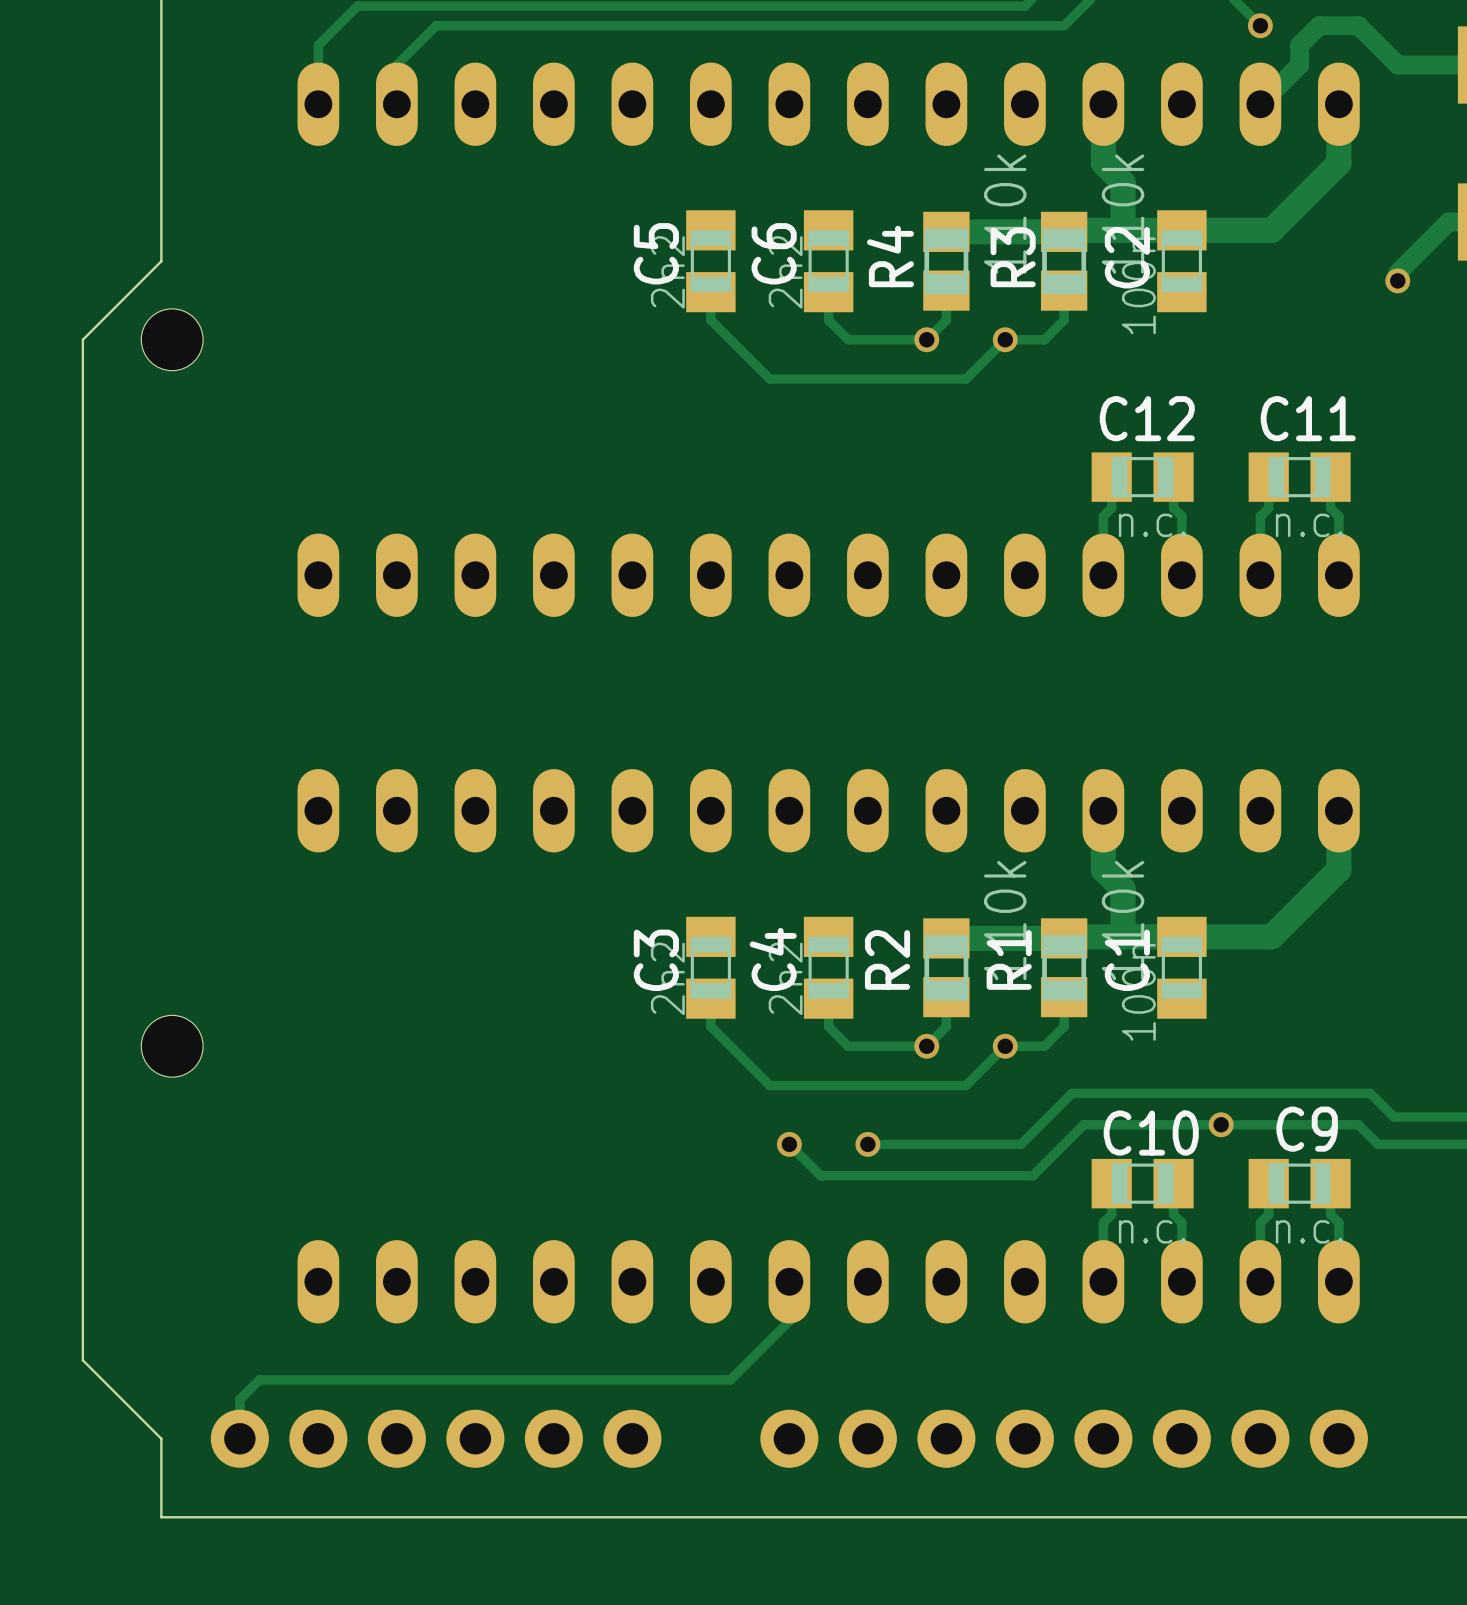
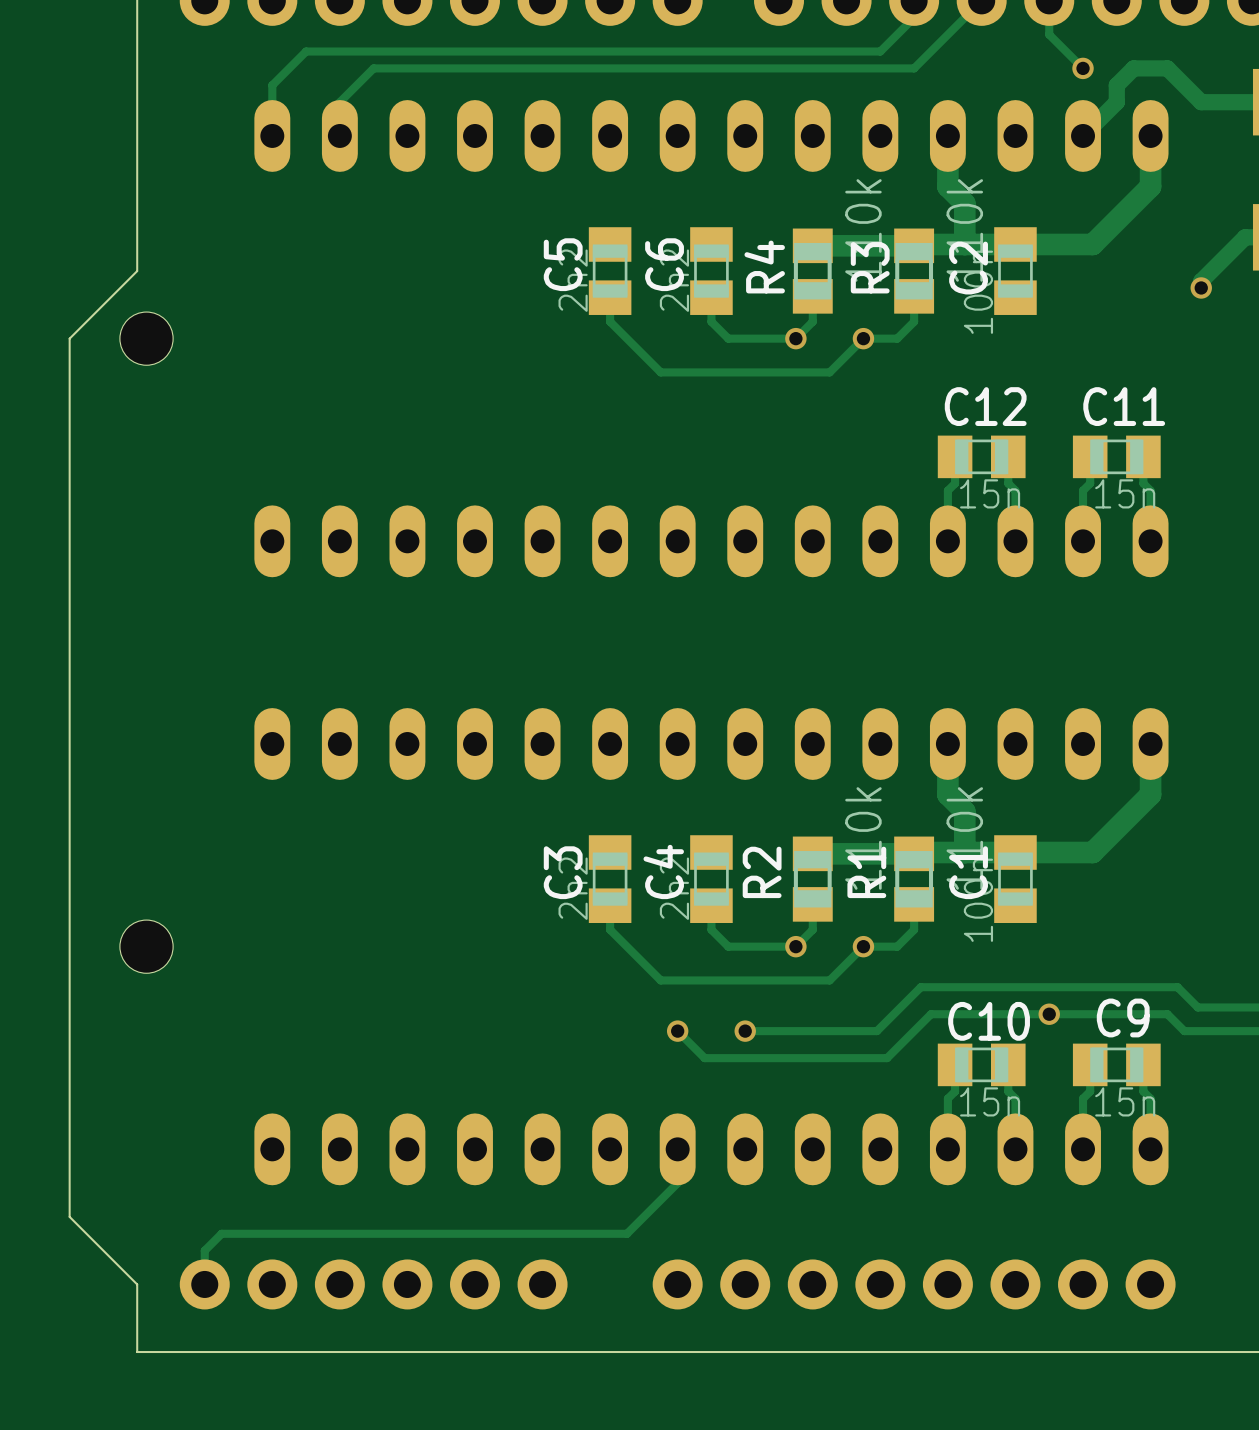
C12 value: n.c. (1152, 525) -> 15n (990, 493)
C11 value: n.c. (1309, 525) -> 15n (1125, 493)
C10 value: n.c. (1152, 1231) -> 15n (990, 1101)
C9 value: n.c. (1309, 1231) -> 15n (1125, 1101)

